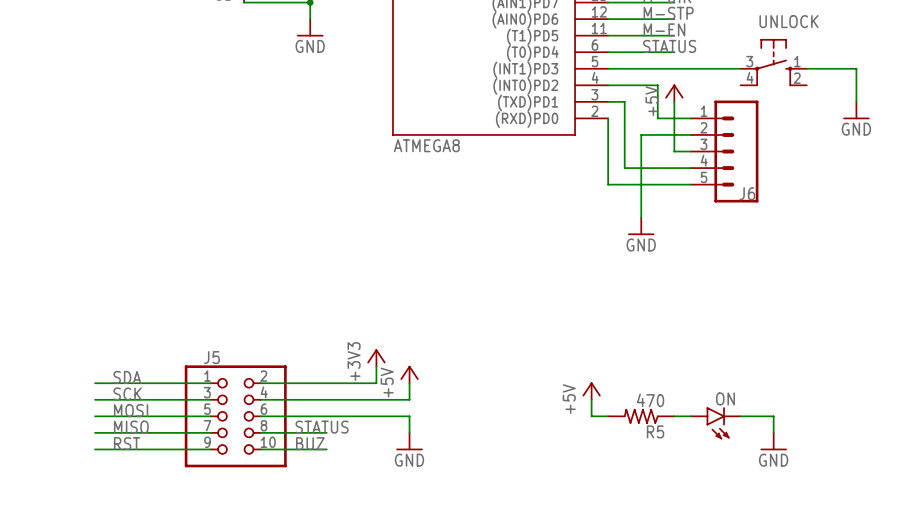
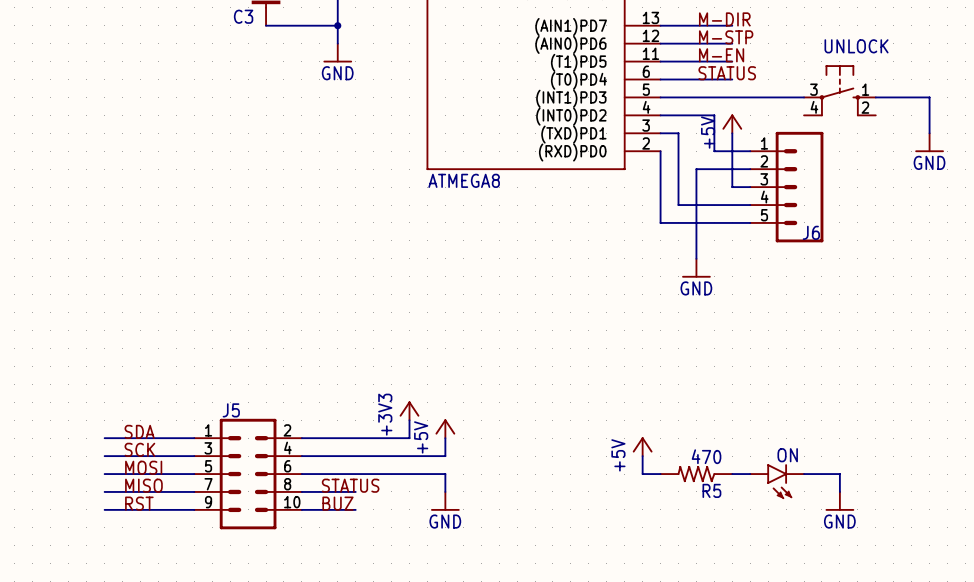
J5 symbol: [184, 365, 287, 468] -> [194, 418, 302, 530]

